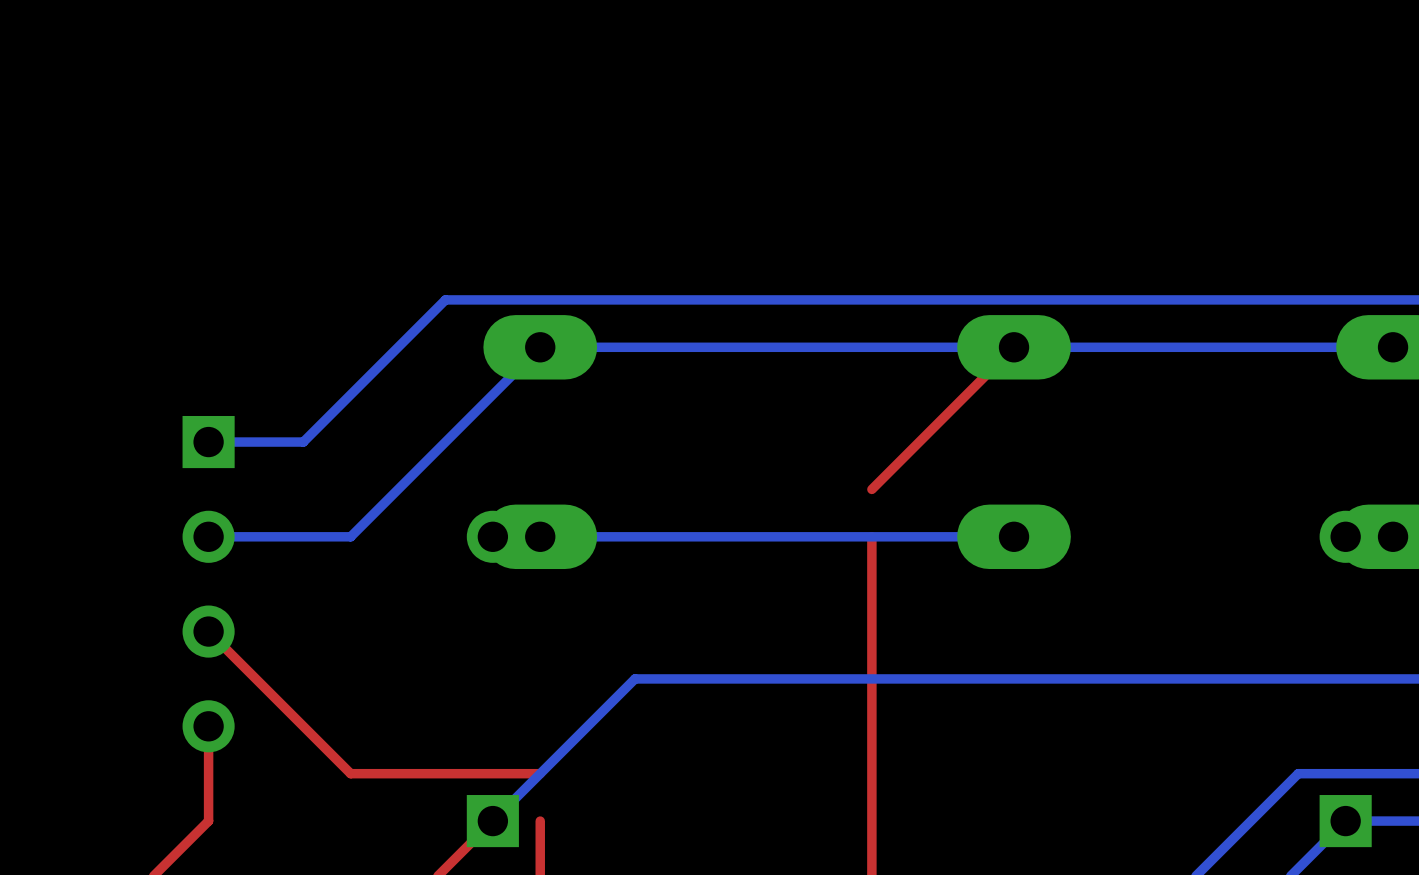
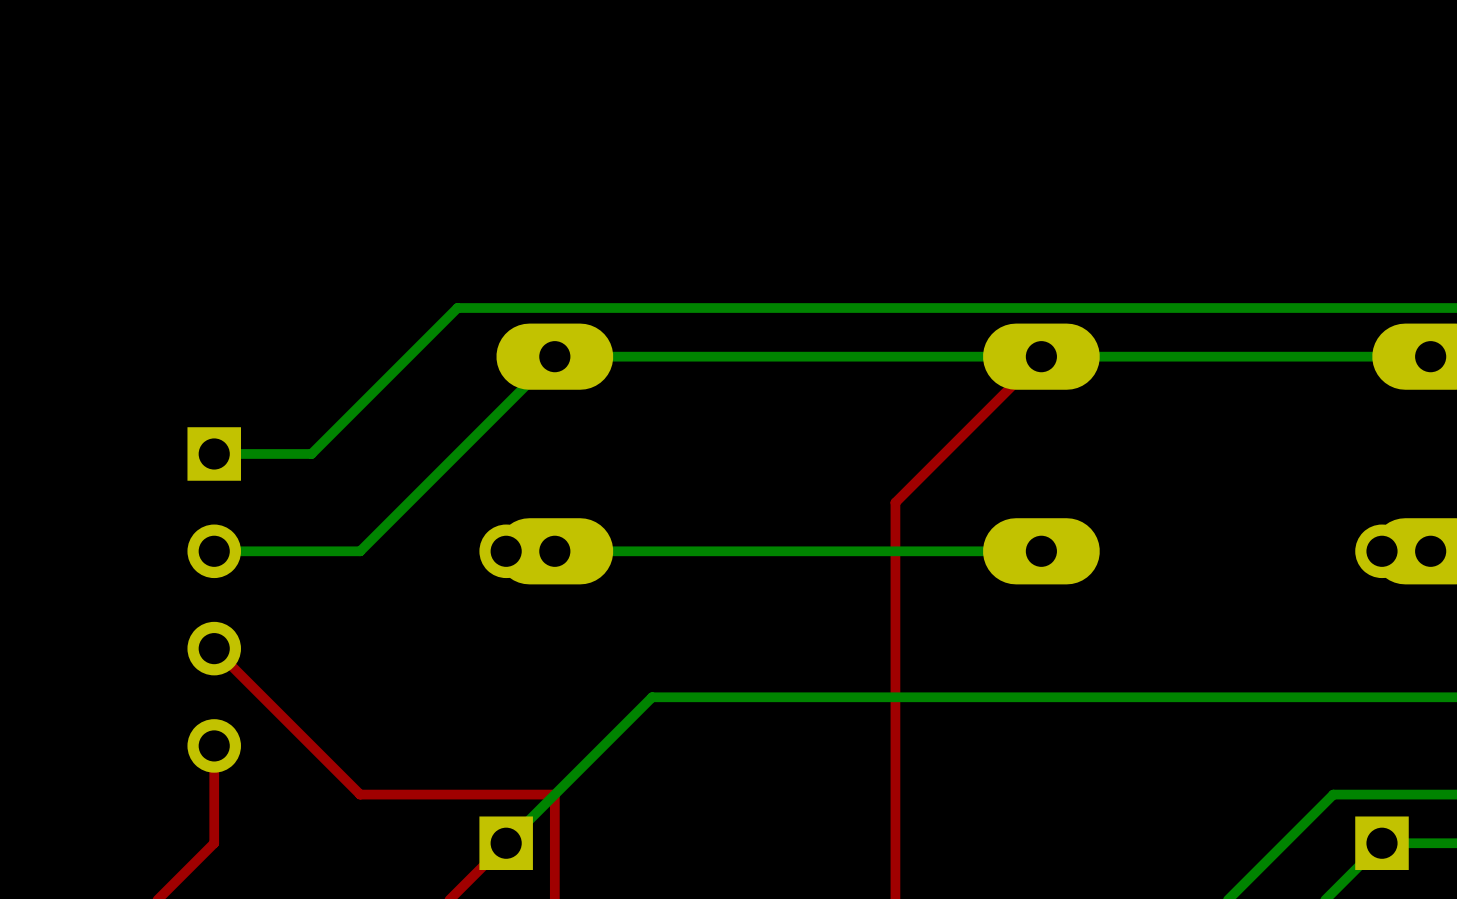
top track: none -> (895, 502) (895, 551)
top track: none -> (554, 794) (554, 843)

